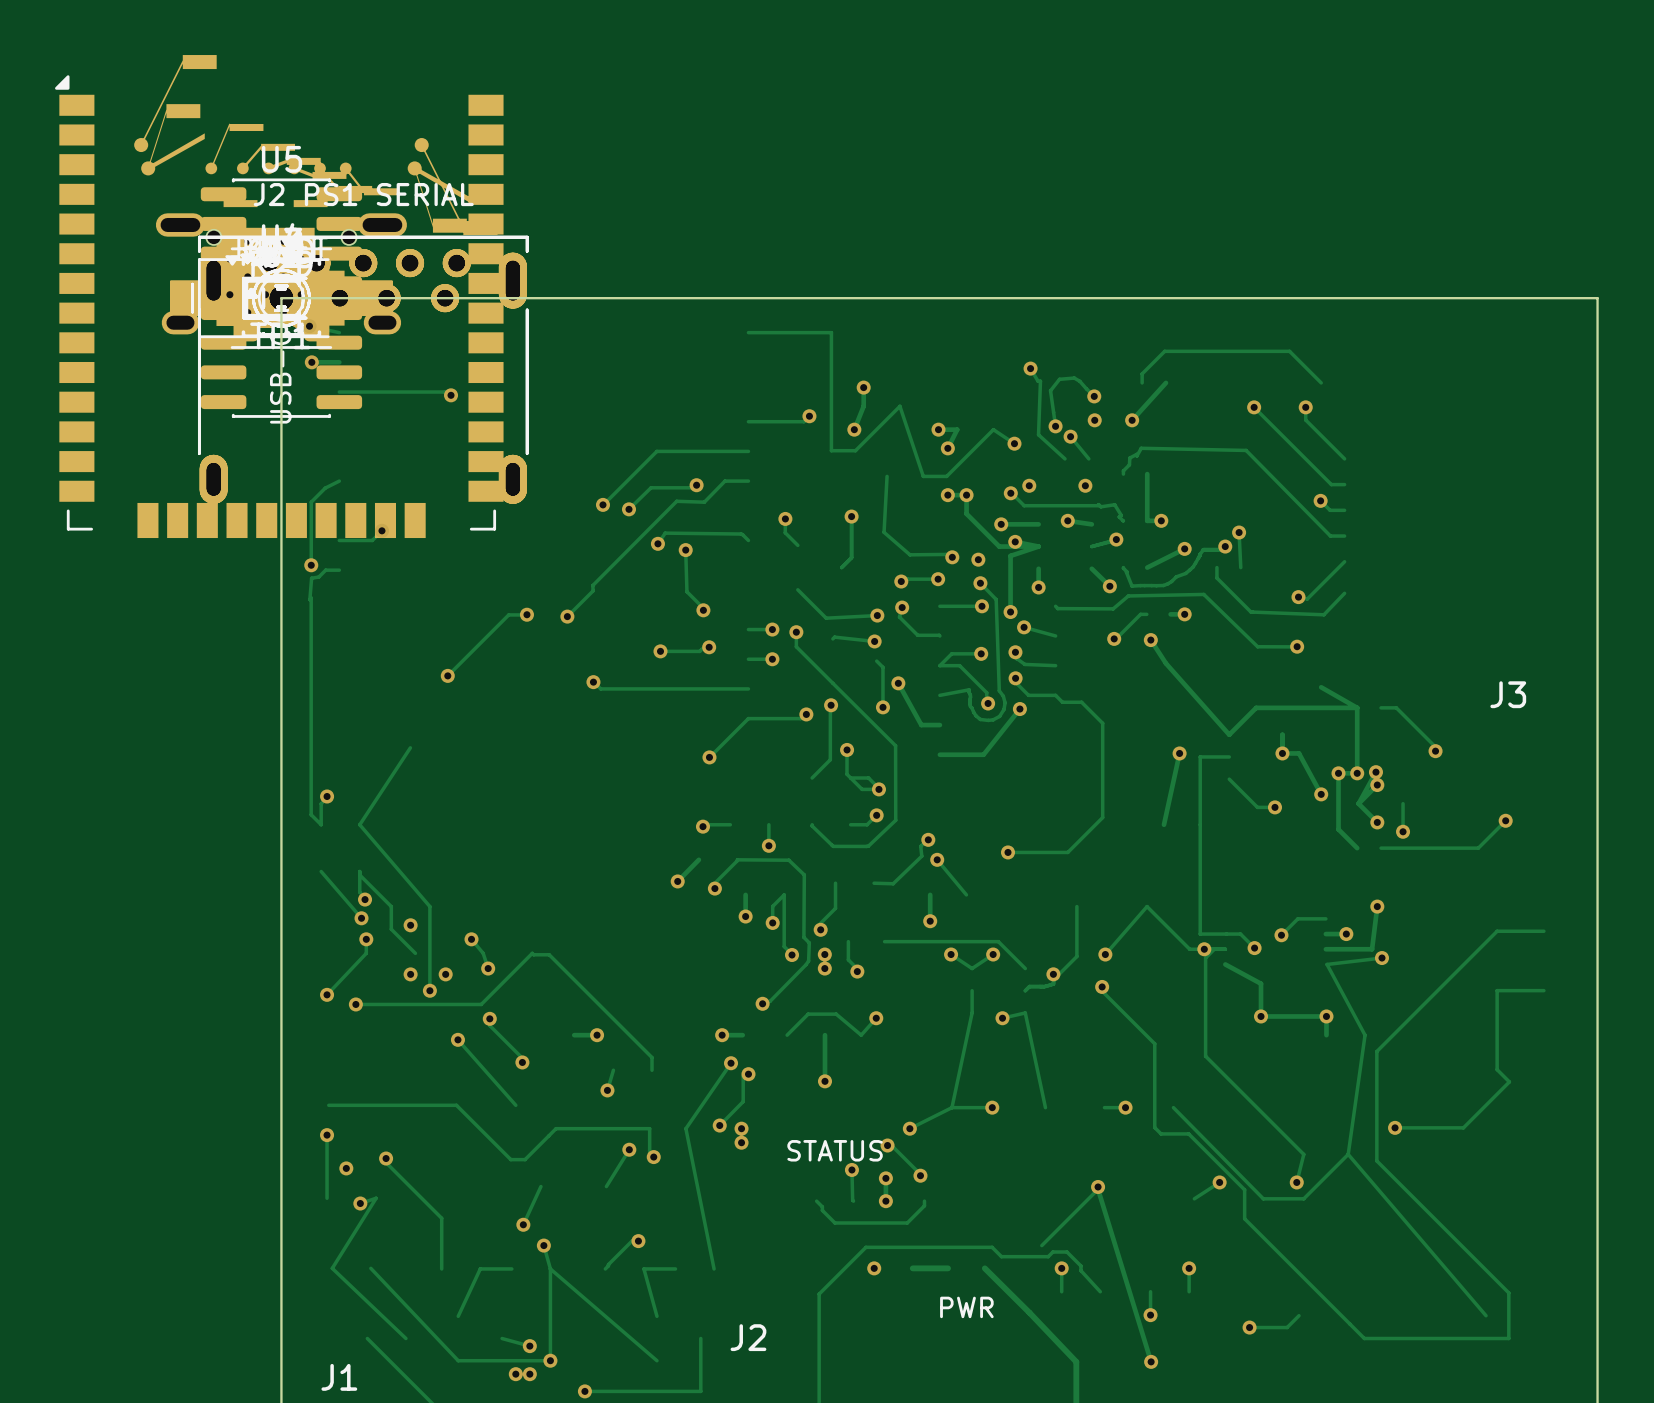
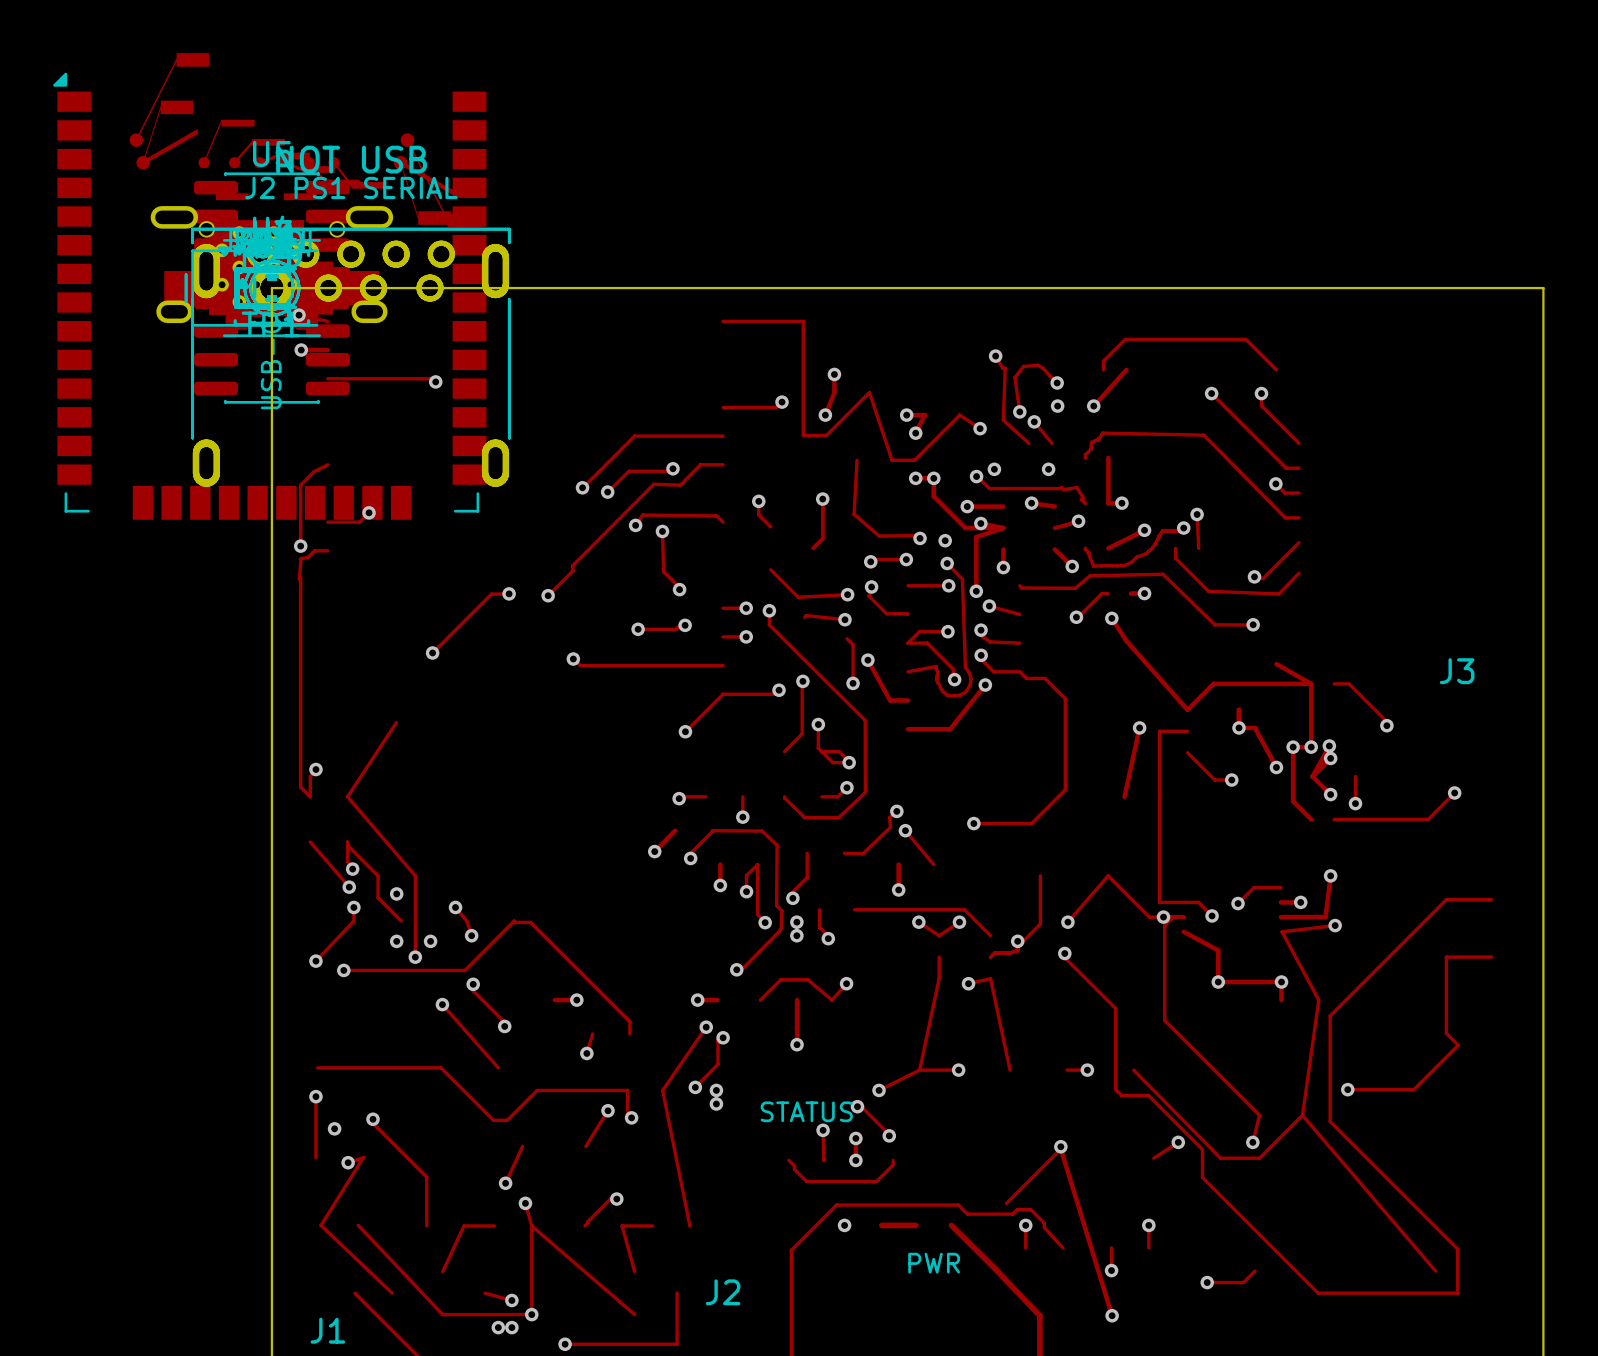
part text: none -> NOT USB (351, 159)

